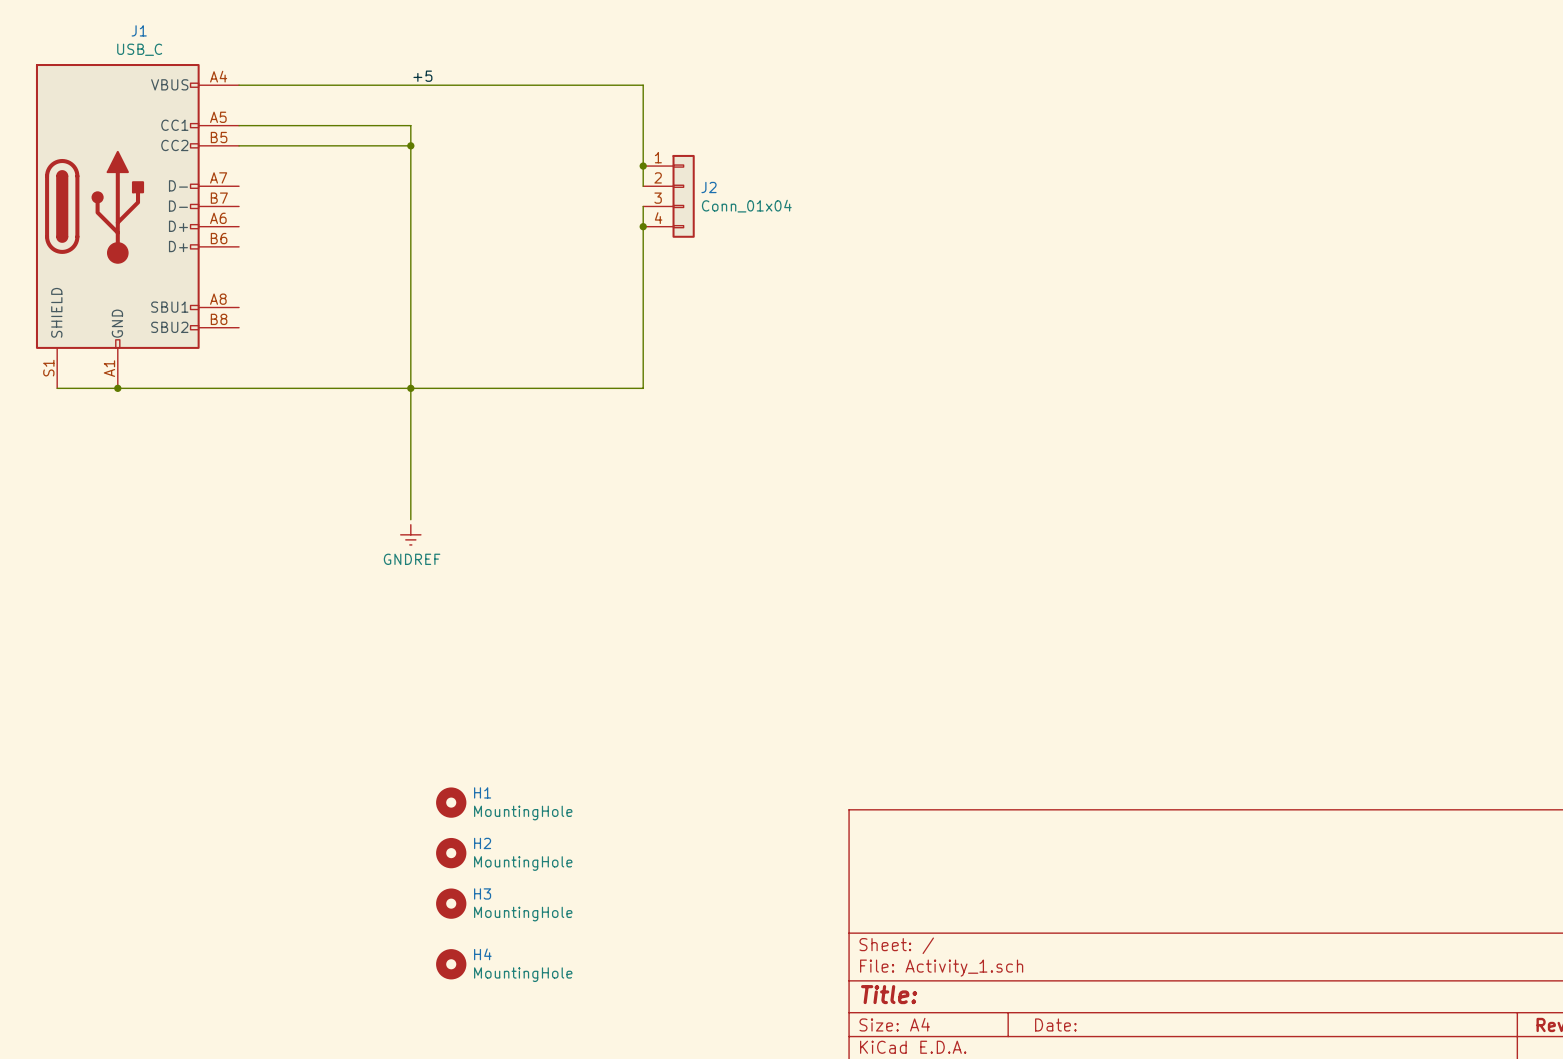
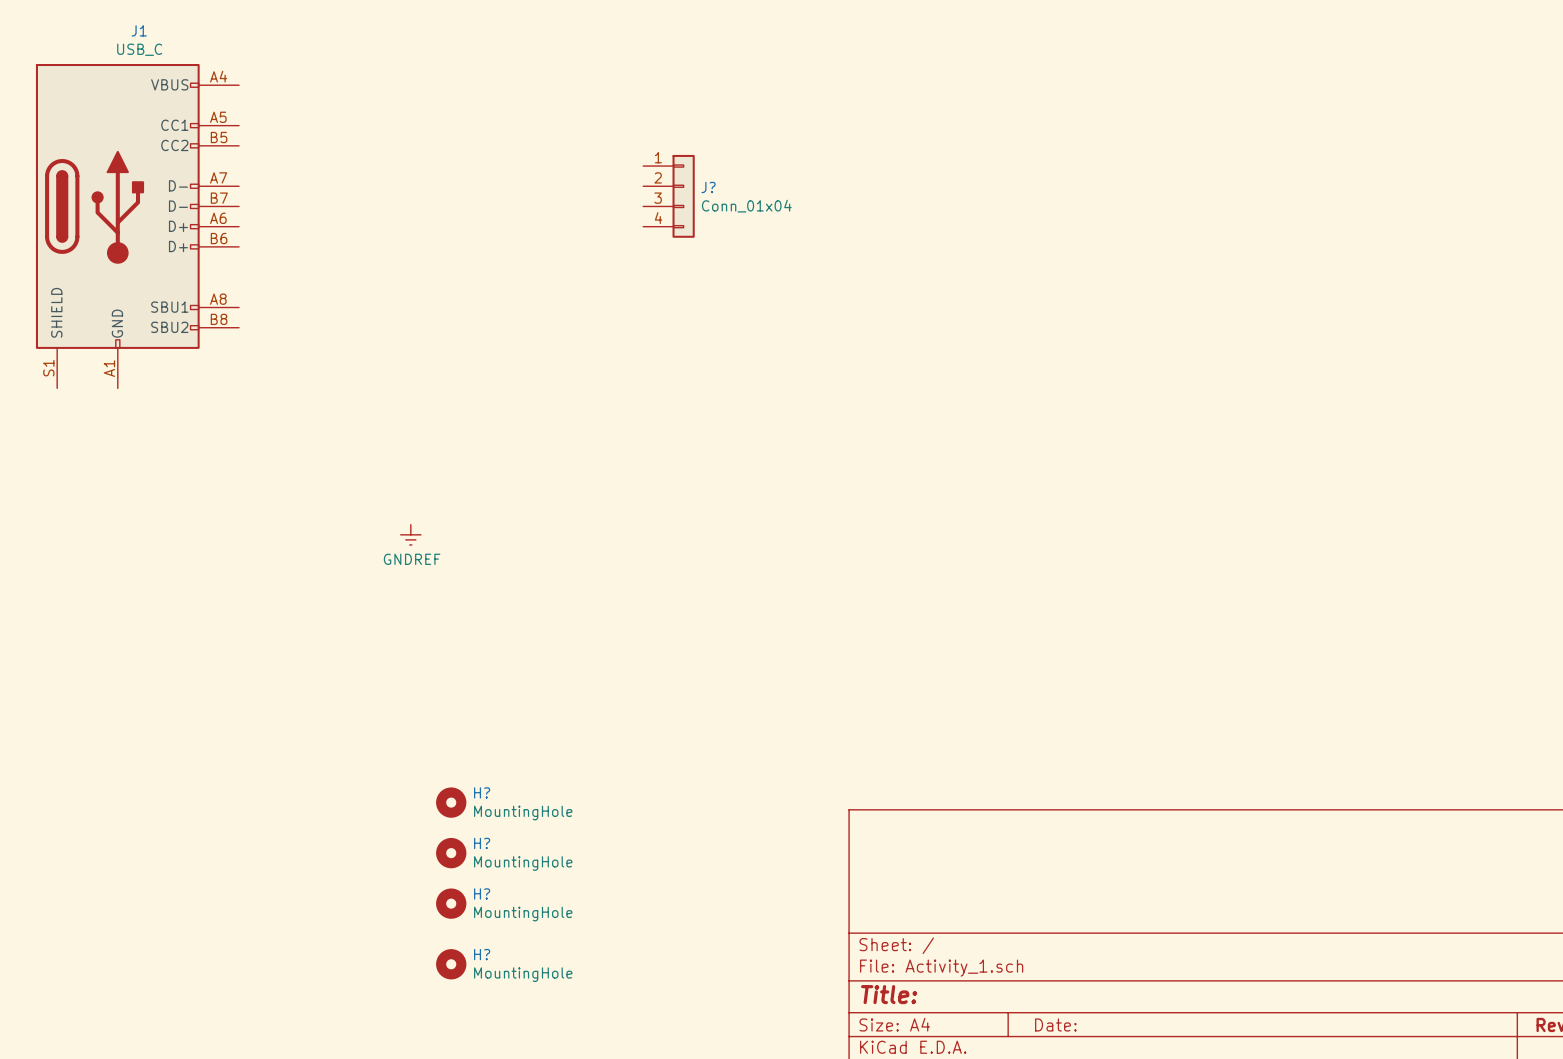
label: +5 (422, 76) -> none
wire: (239, 85) (643, 85) (643, 186) -> none
wire: (239, 125) (410, 125) (410, 519) -> none
wire: (239, 145) (410, 145) -> none
junction: (410, 145) -> none
junction: (643, 166) -> none
J2 name: J2 (709, 187) -> J? (708, 187)
wire: (643, 206) (643, 388) (57, 388) -> none
junction: (643, 226) -> none
junction: (117, 388) -> none
junction: (410, 388) -> none
H1 name: H1 (482, 792) -> H? (482, 792)
H2 name: H2 (482, 843) -> H? (482, 843)
H3 name: H3 (482, 893) -> H? (482, 893)
H4 name: H4 (482, 954) -> H? (482, 954)

